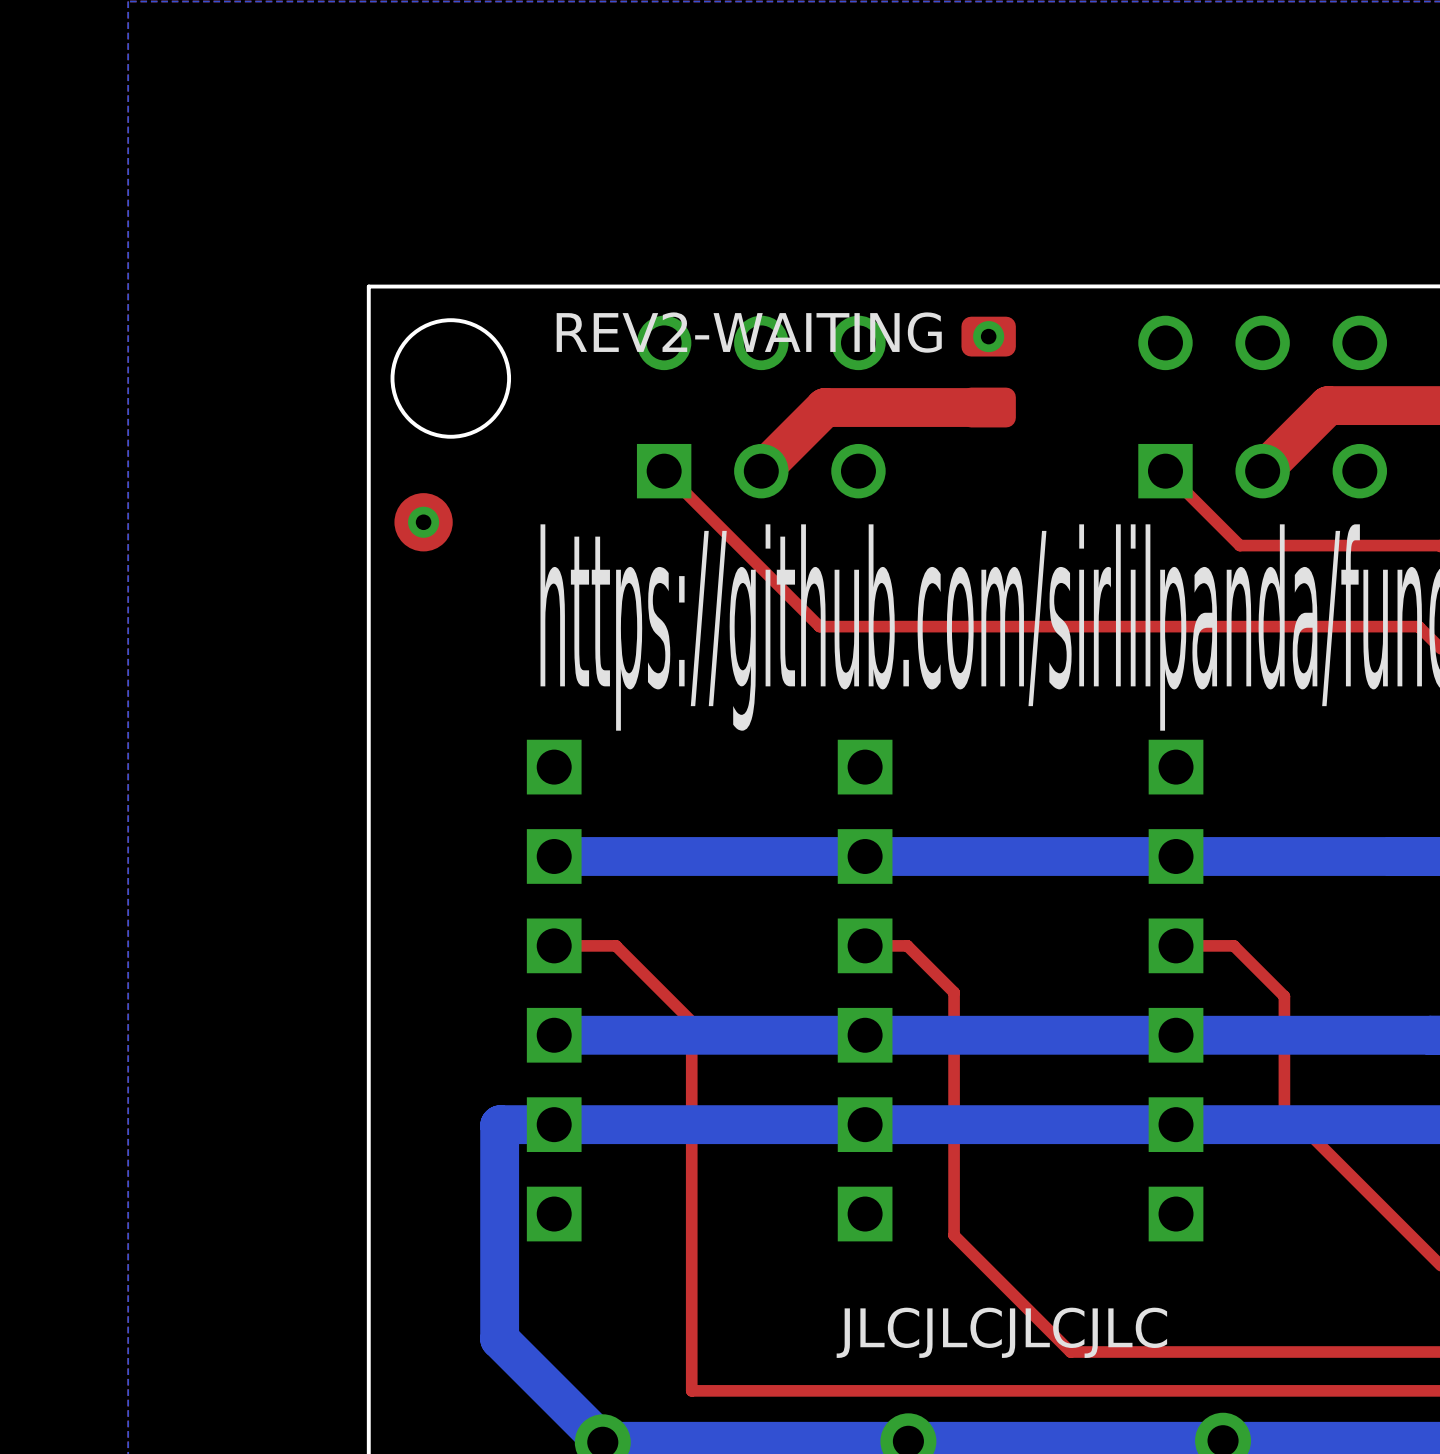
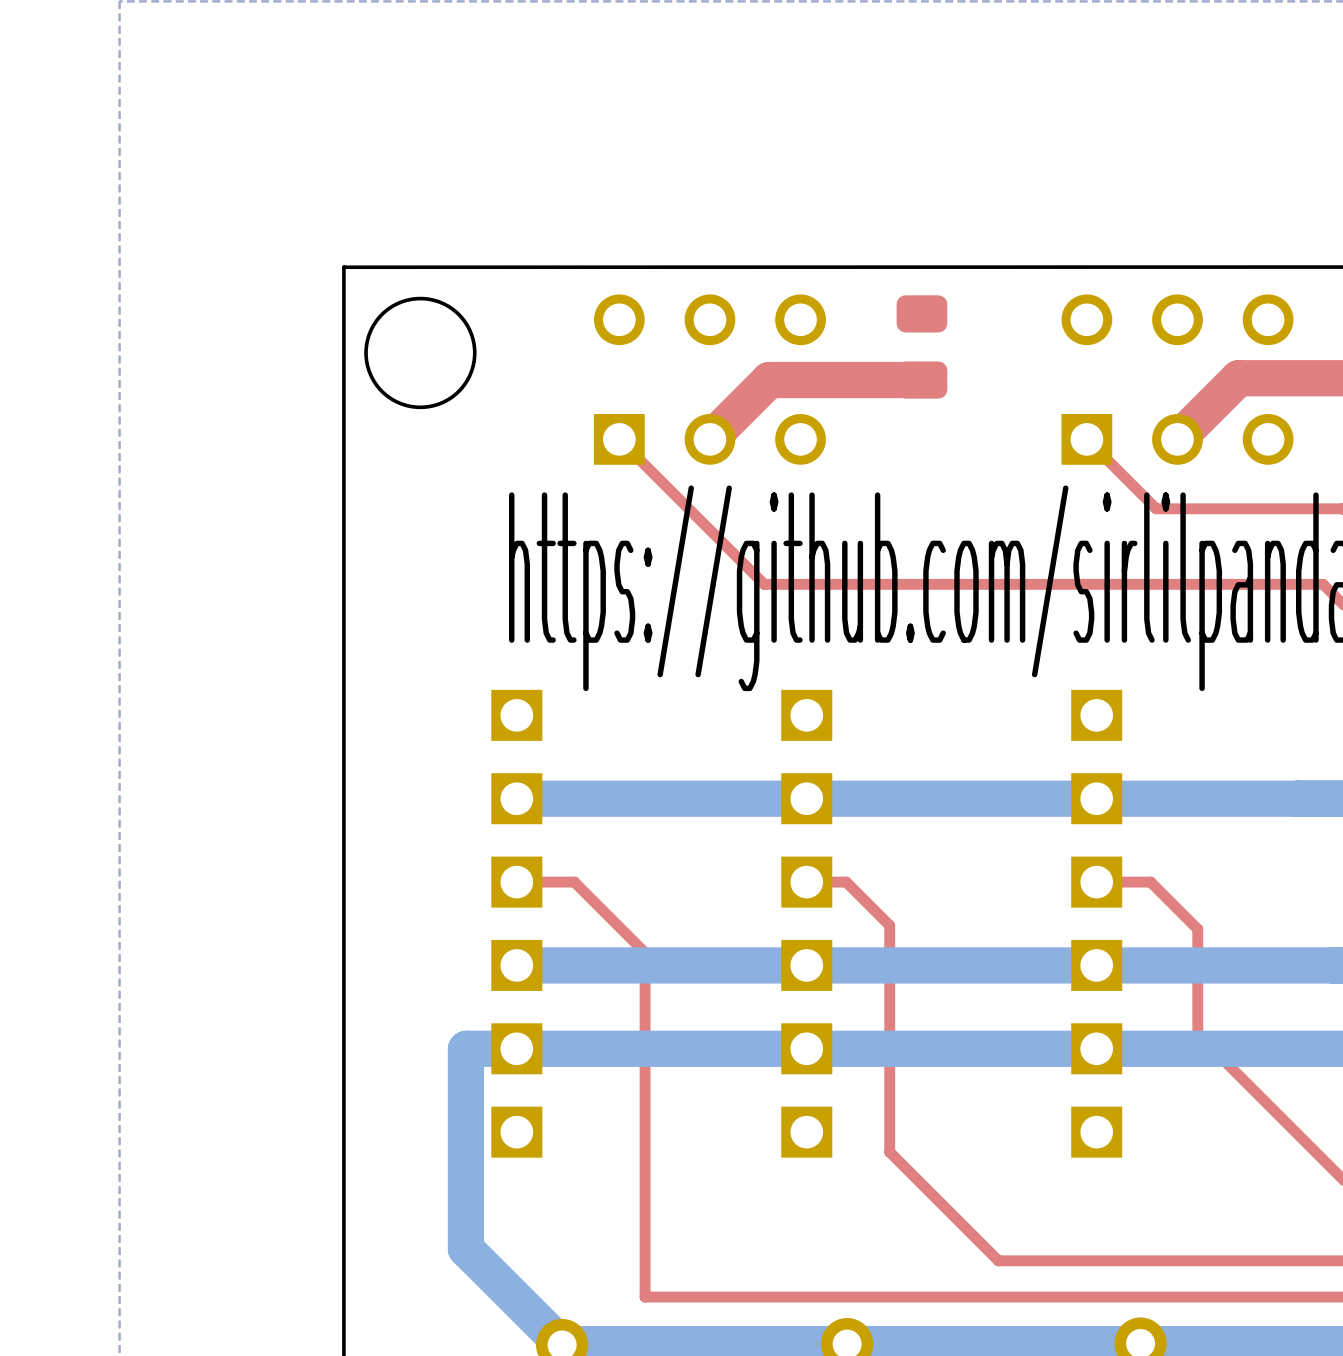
text: REV2-WAITING (749, 332) -> none
via: (988, 336) -> none
part: (423, 522) -> none
via: (423, 522) -> none
text: JLCJLCJLCJLC (1001, 1332) -> none

